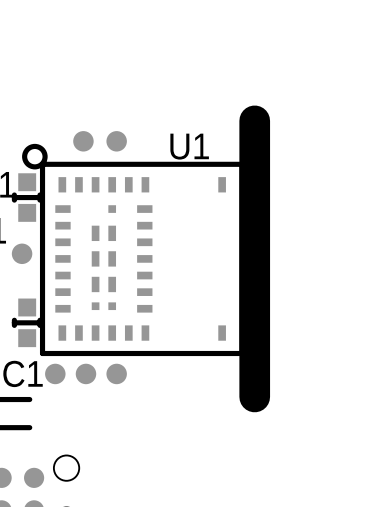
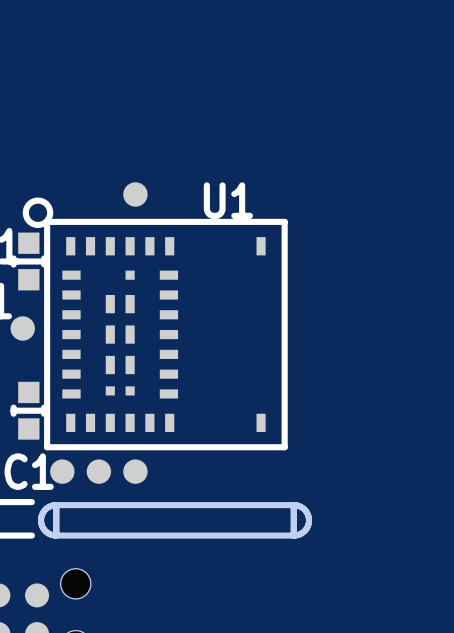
board edge: (254, 120) (254, 396) -> none
part: (83, 141) -> none
board edge: none -> (56, 505) (56, 535)
board edge: none -> (56, 505) (293, 505)
board edge: none -> (56, 505) (45, 509) (41, 520) (45, 531) (56, 535)
board edge: none -> (293, 505) (293, 535)
board edge: none -> (293, 505) (304, 509) (309, 520) (304, 531) (293, 535)
board edge: none -> (56, 535) (293, 535)

